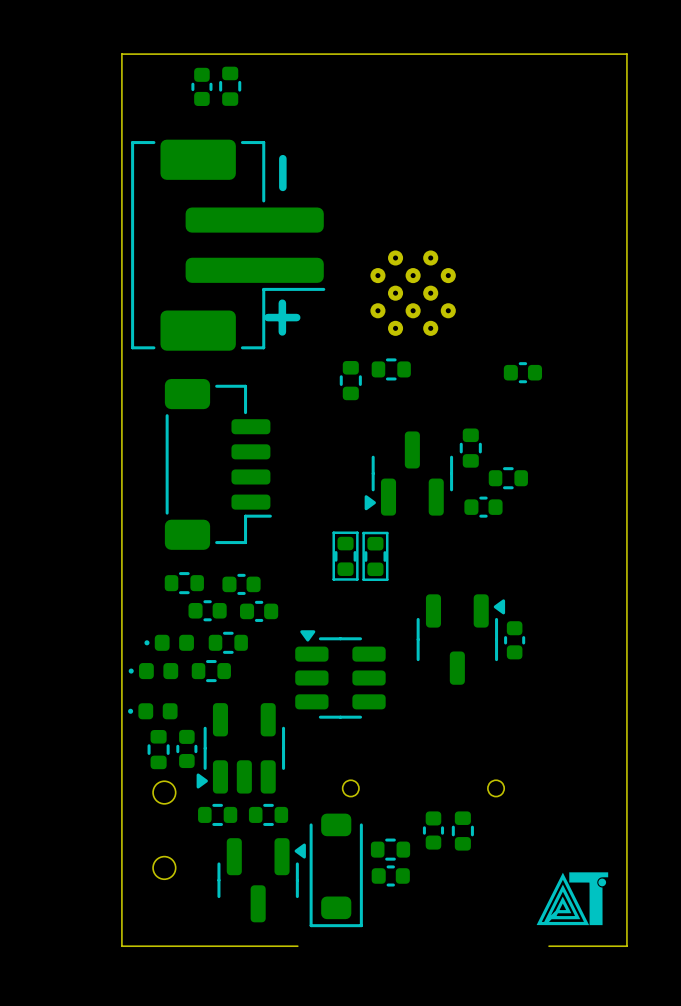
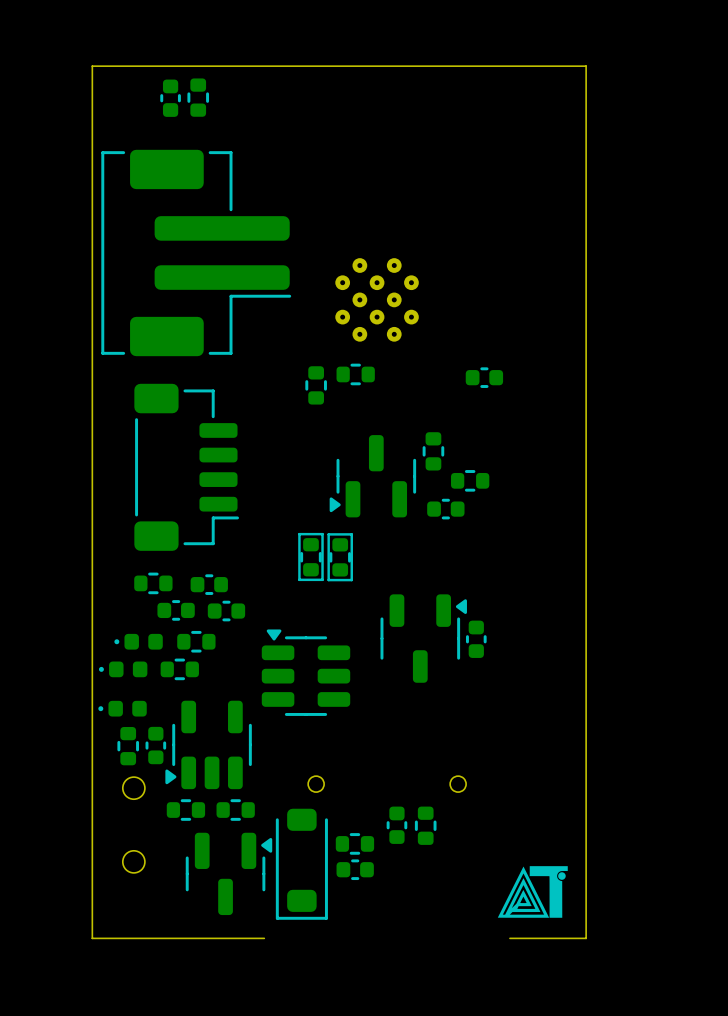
text: - (282, 173) -> none
text: + (282, 317) -> none

